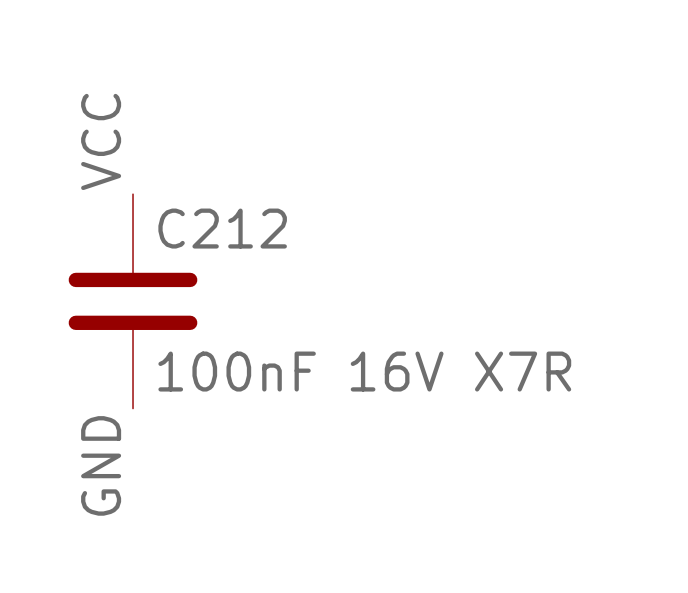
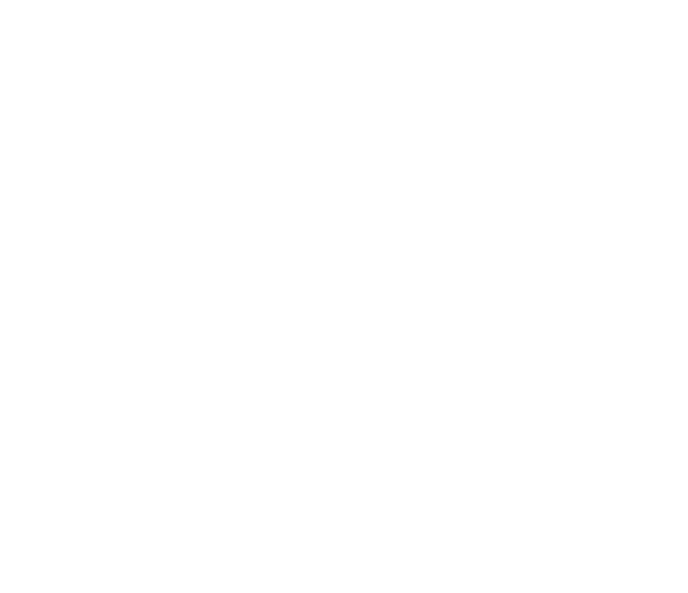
label: VCC (101, 141) -> none
C212: 100nF 16V X7R (133, 301) -> none
label: GND (101, 465) -> none

